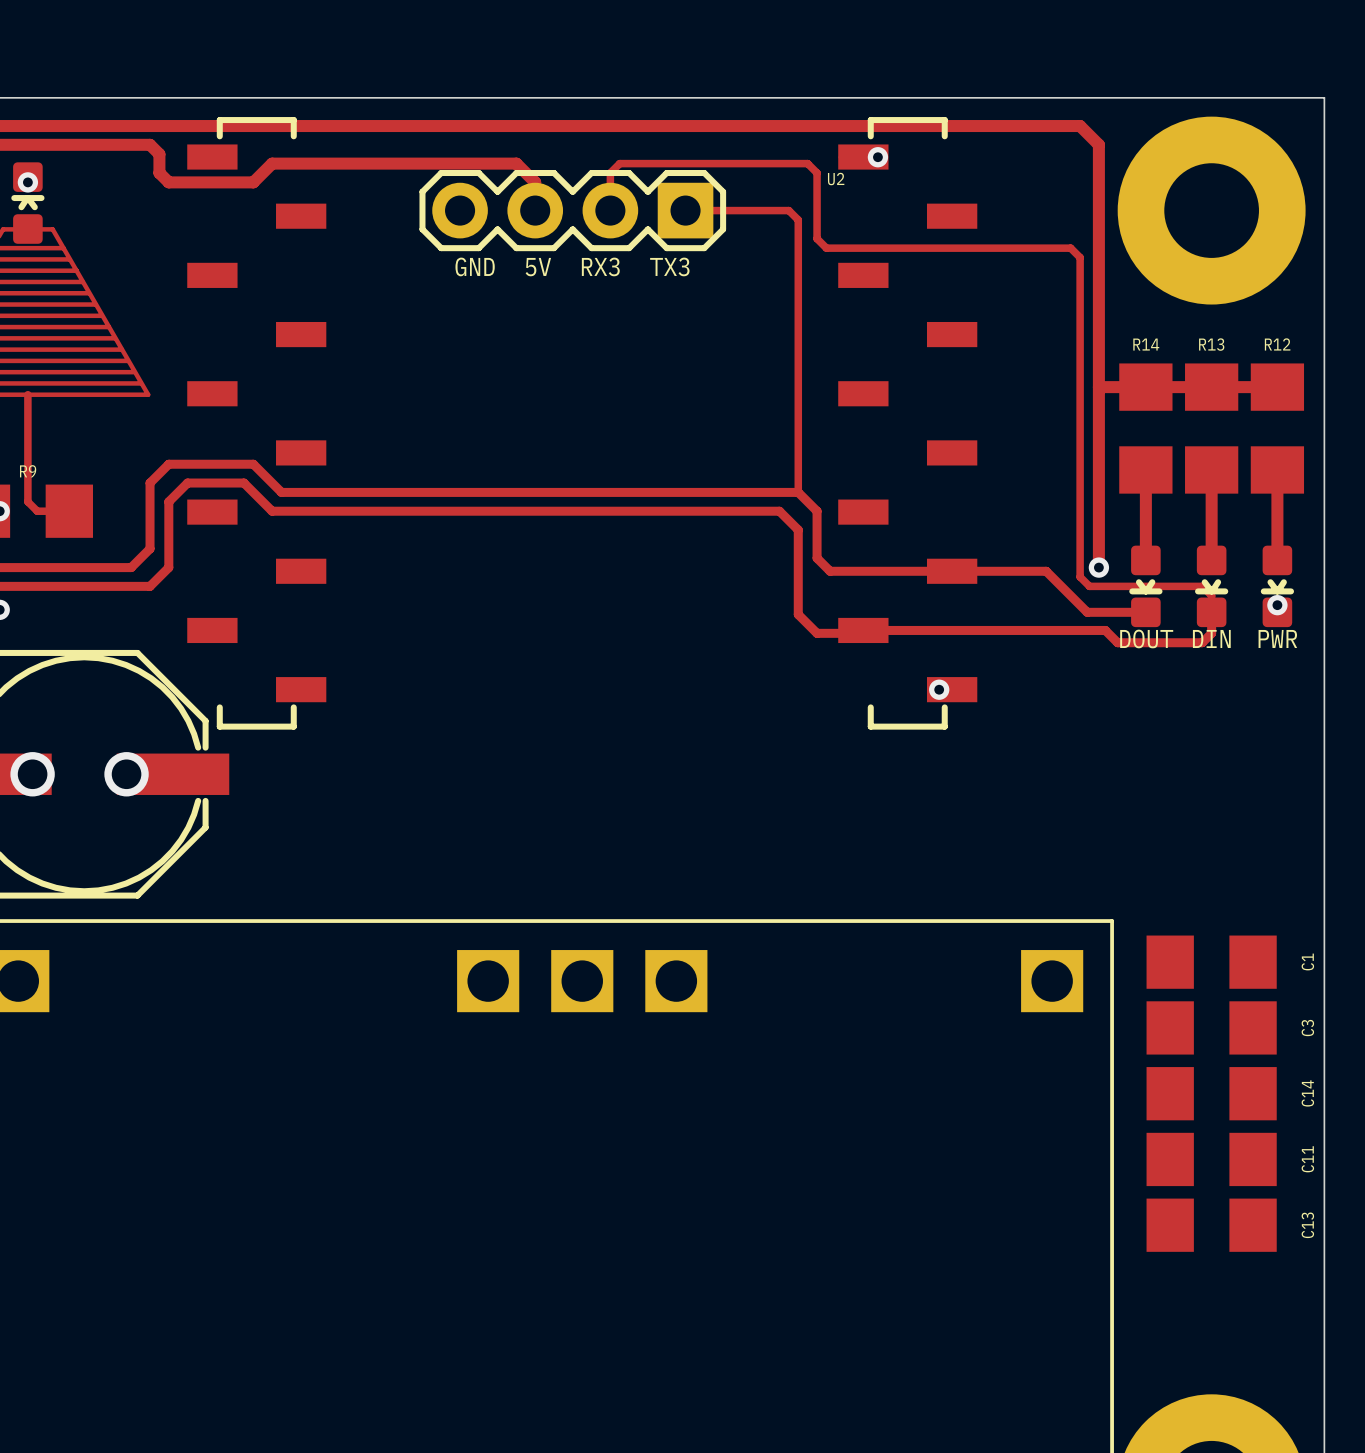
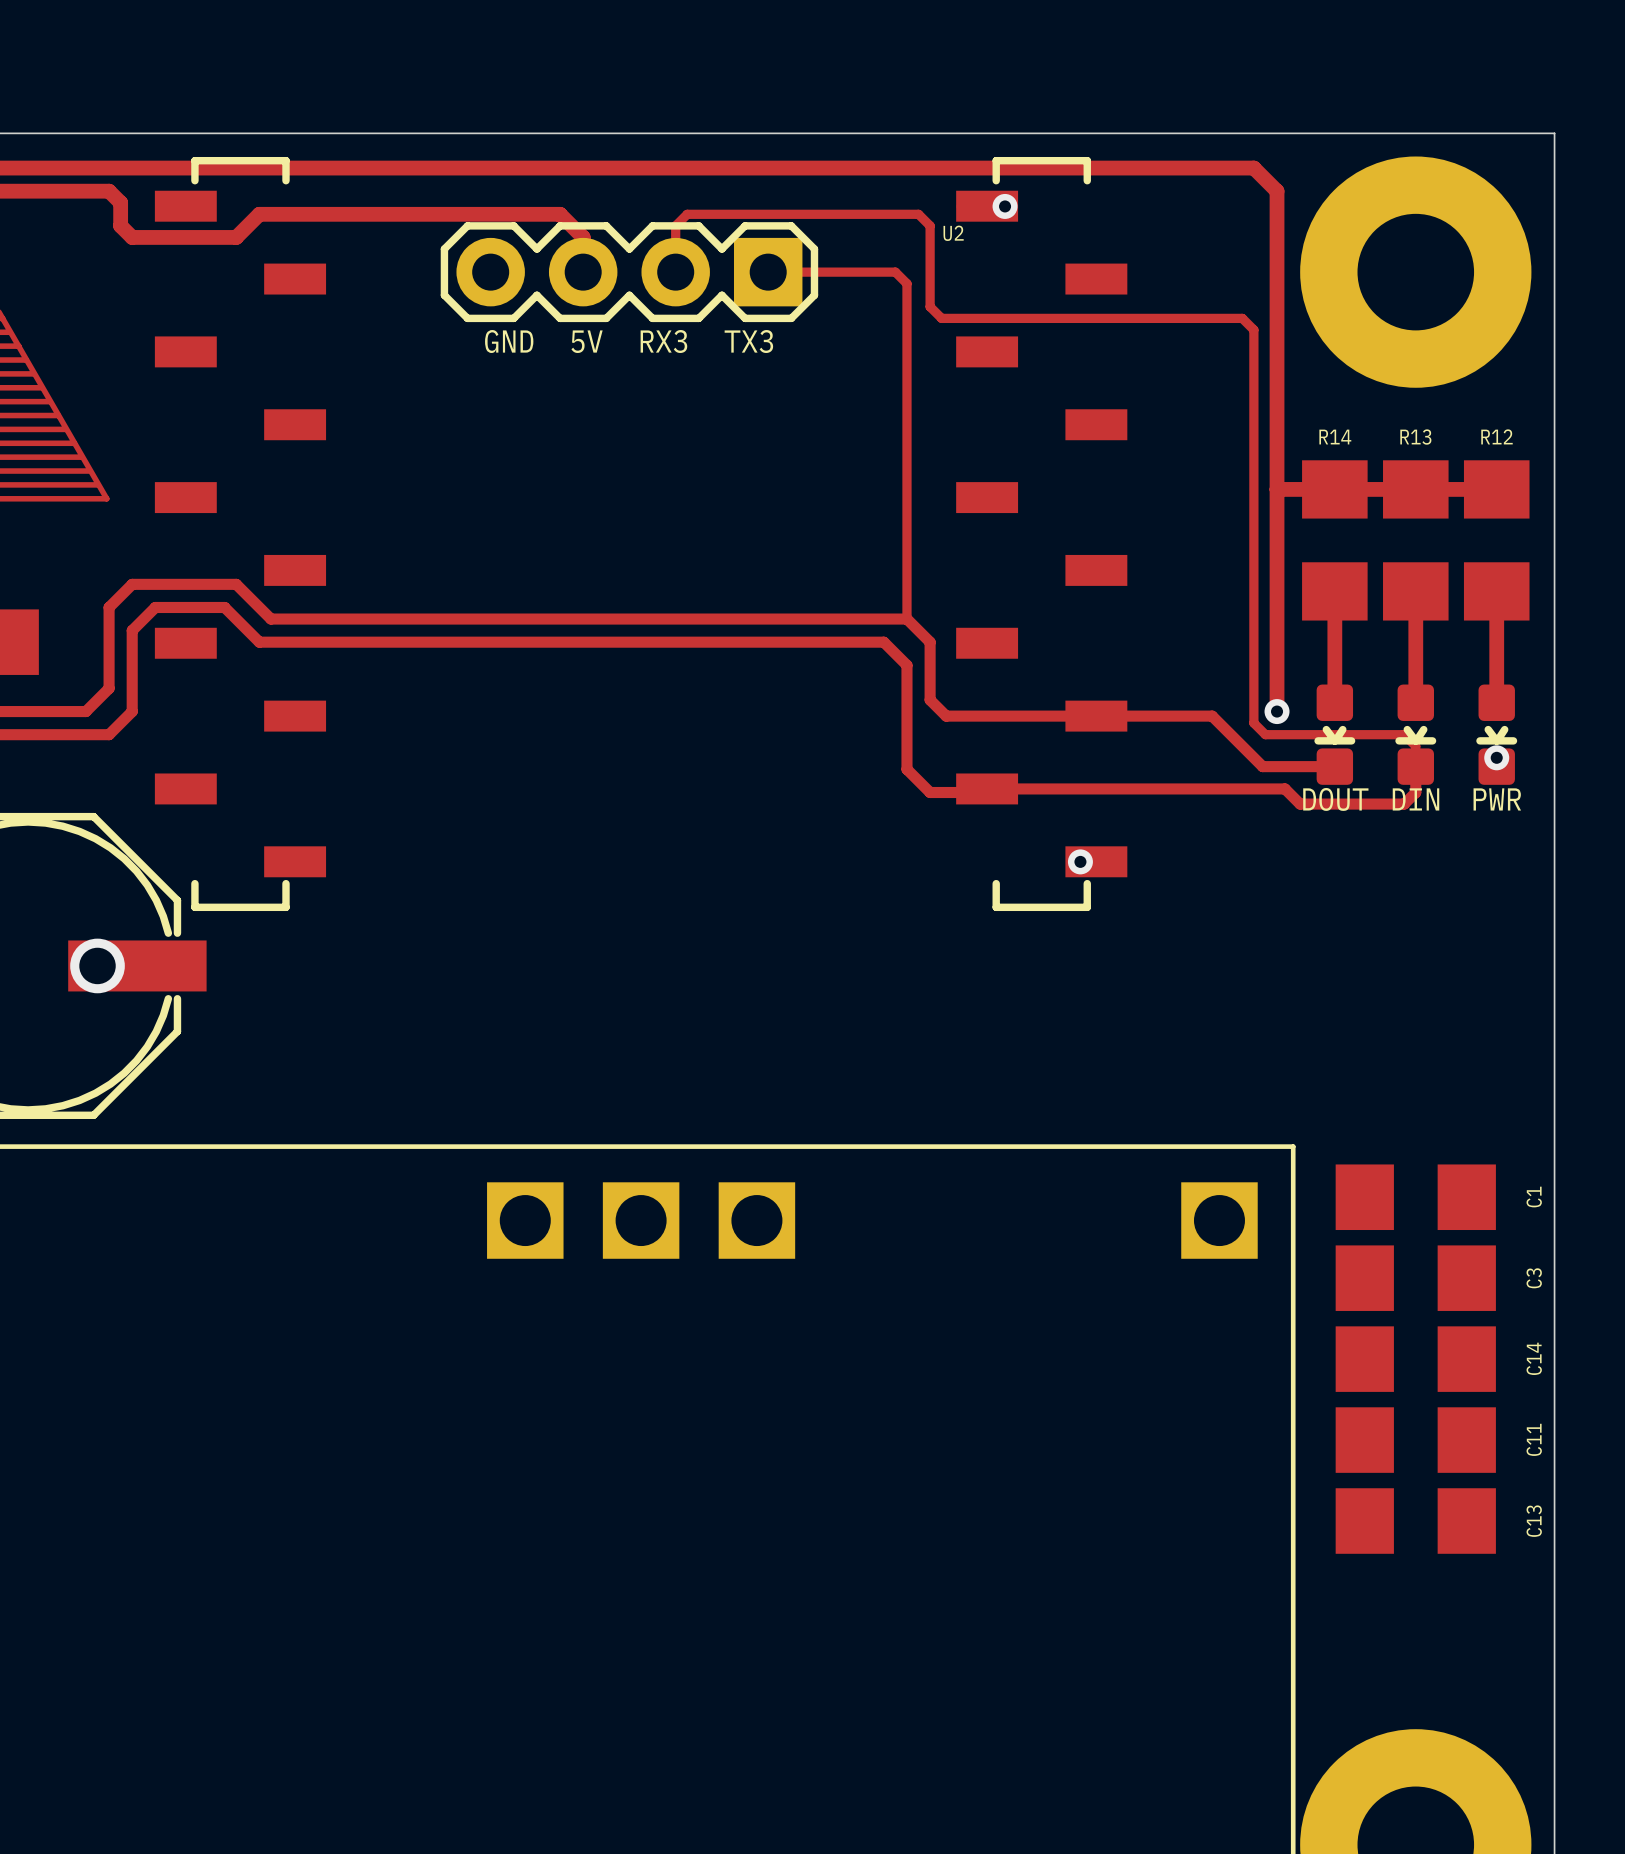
via position: (126, 774) -> (97, 965)

